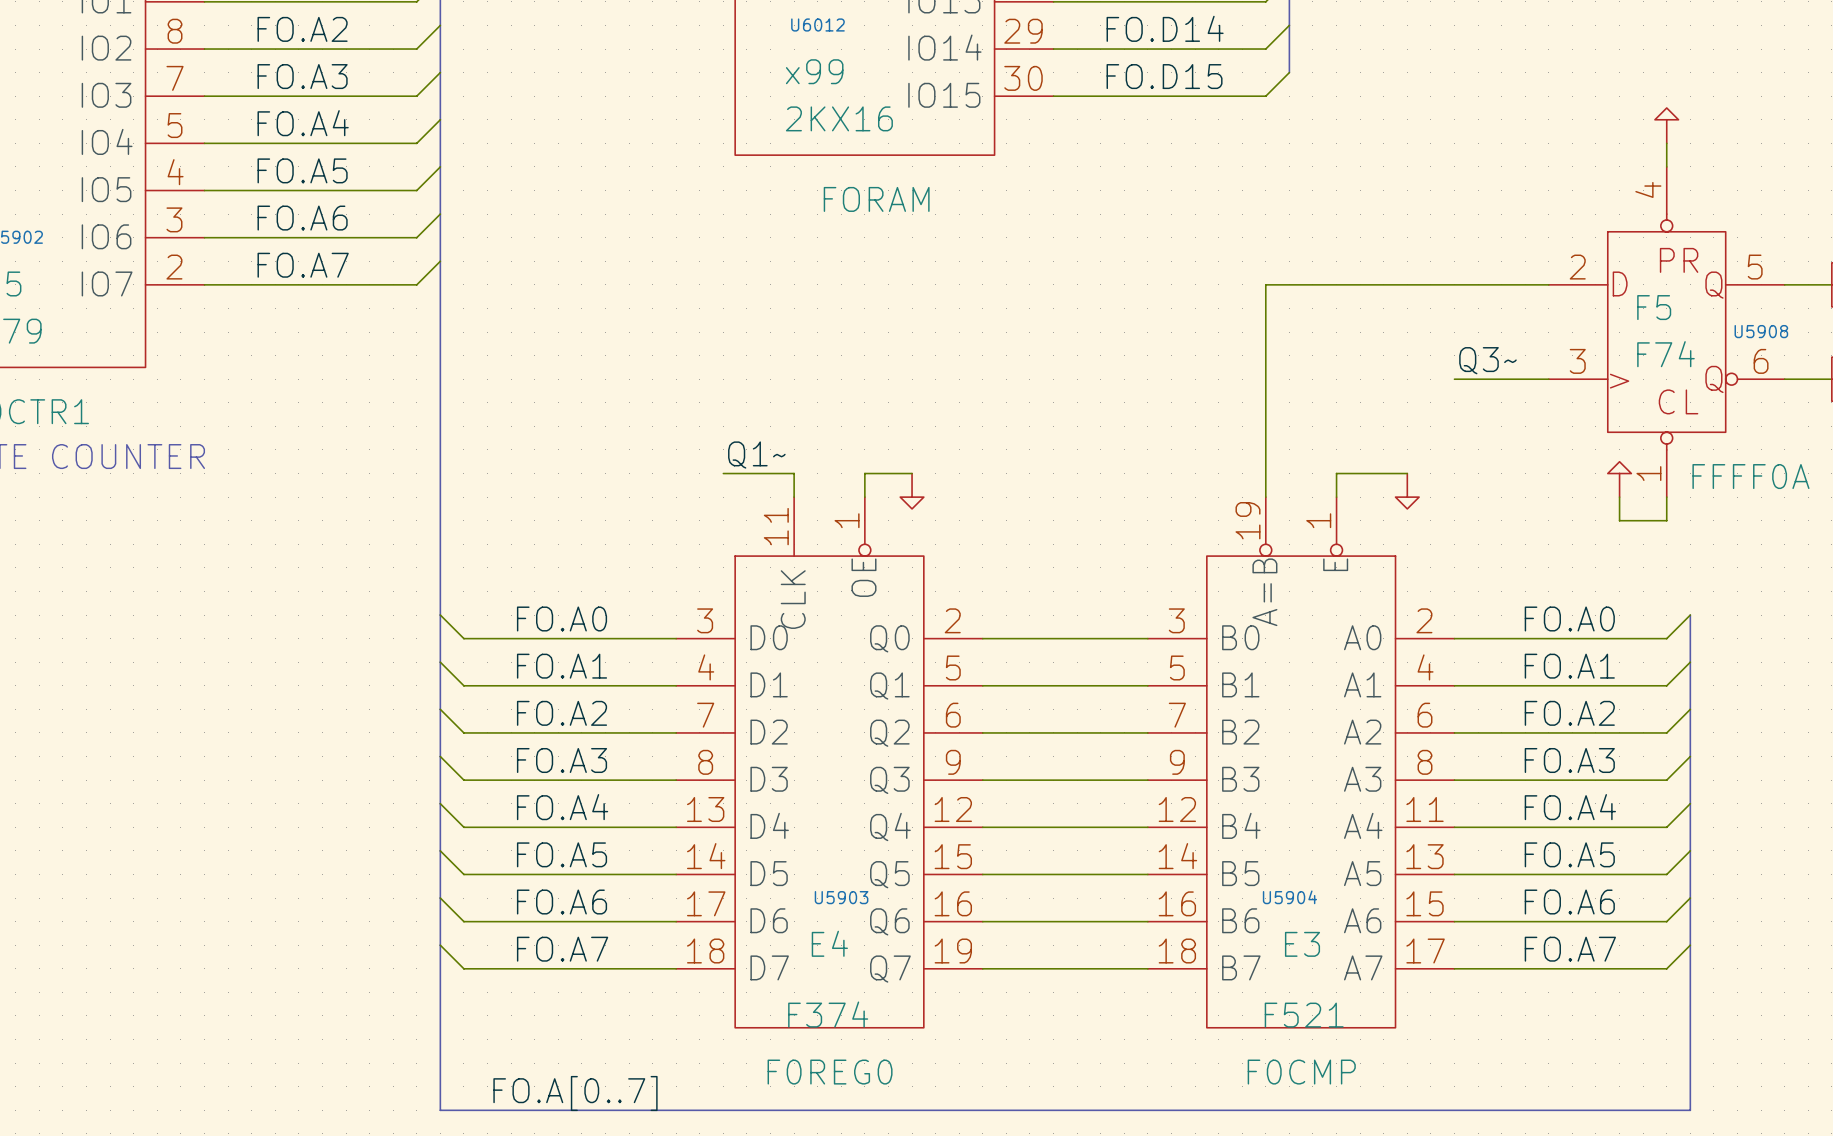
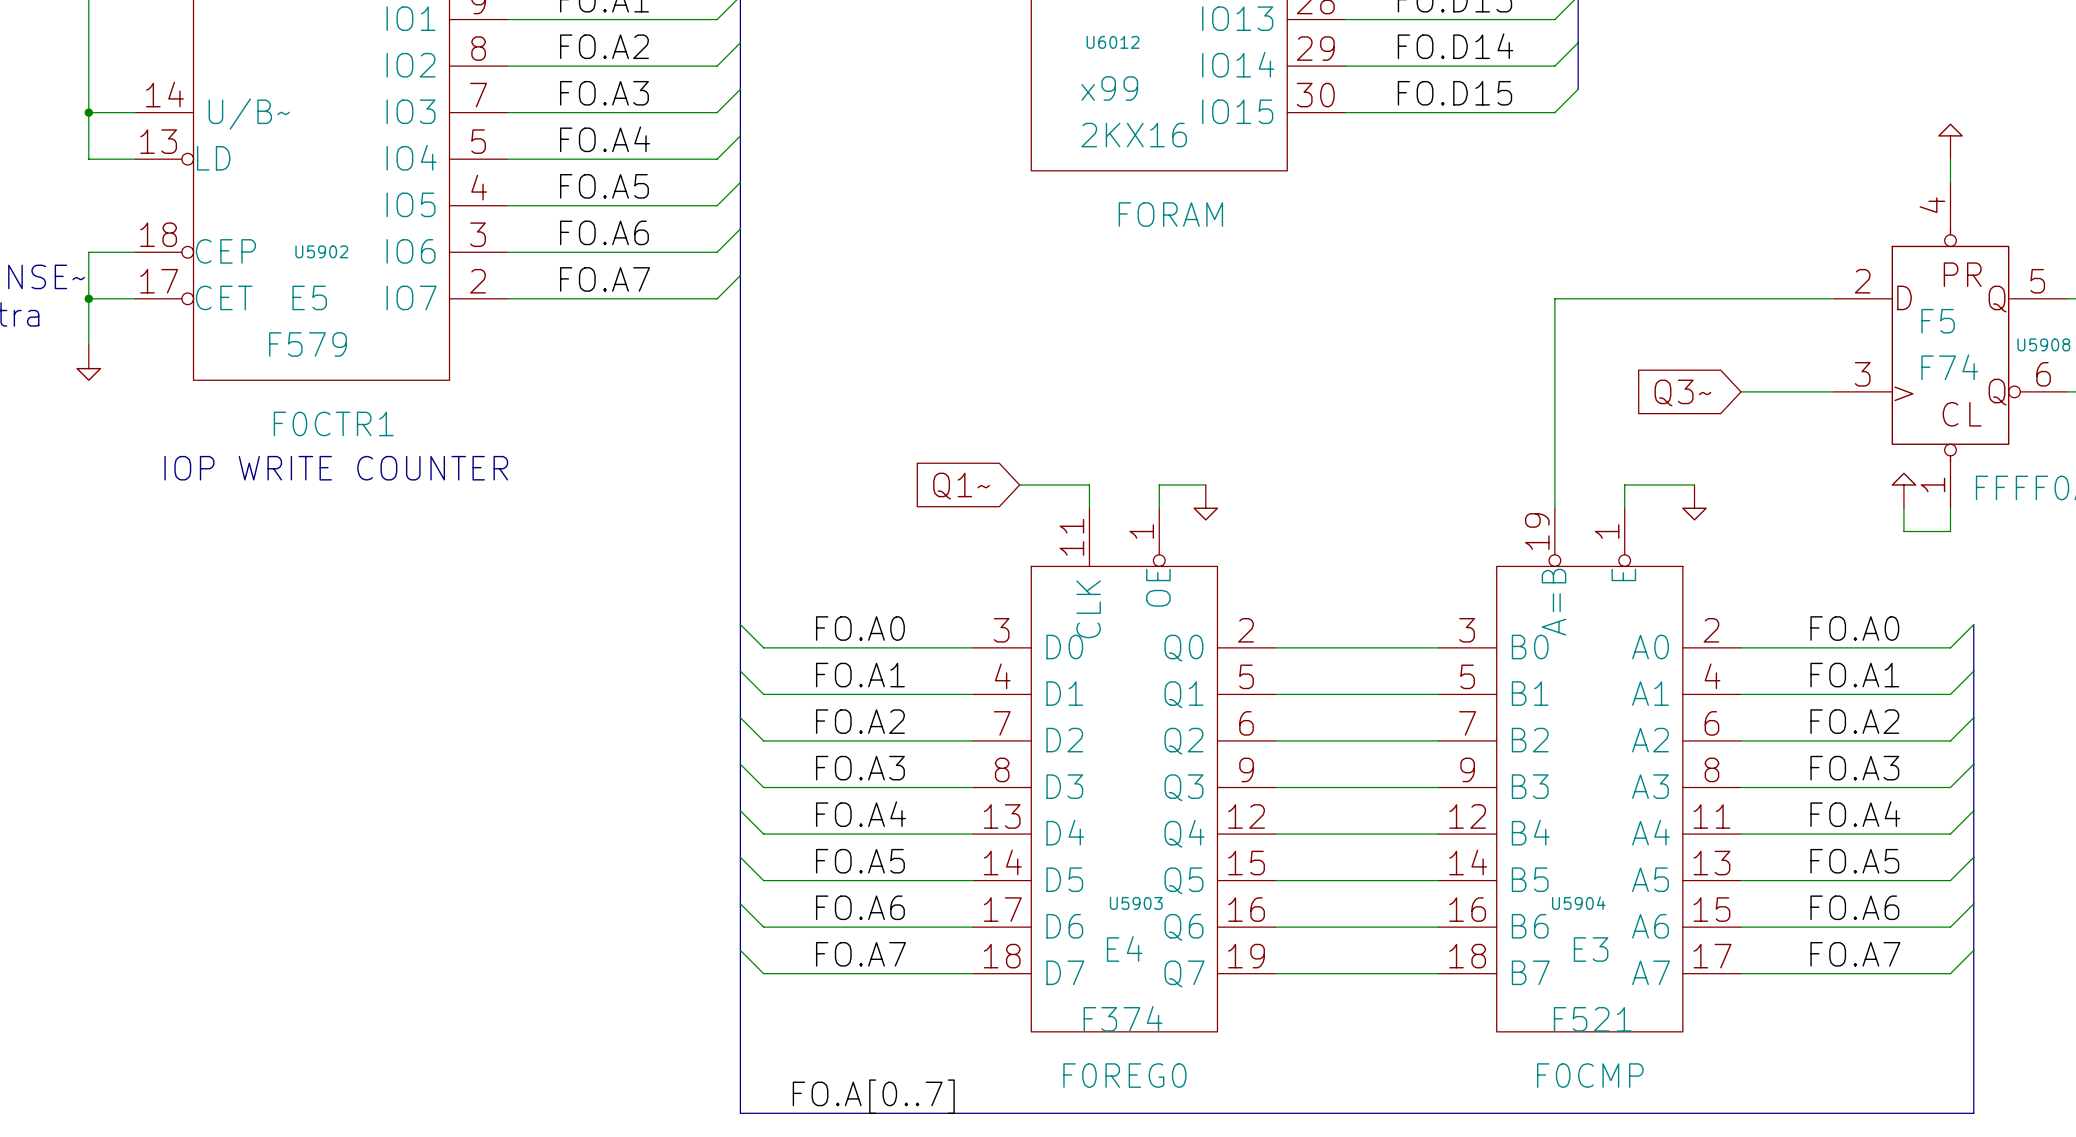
label: Q3~ (1487, 360) -> none
global label: none -> Q3~ (1682, 393)
label: Q1~ (756, 455) -> none
global label: none -> Q1~ (961, 486)

